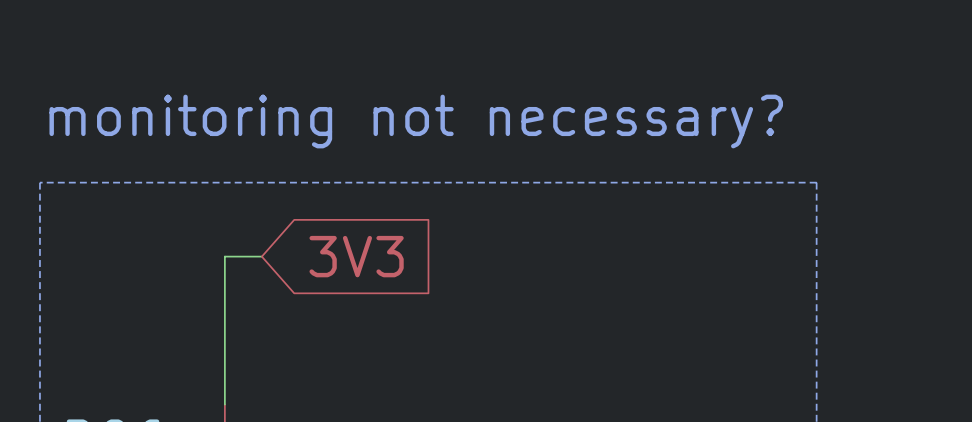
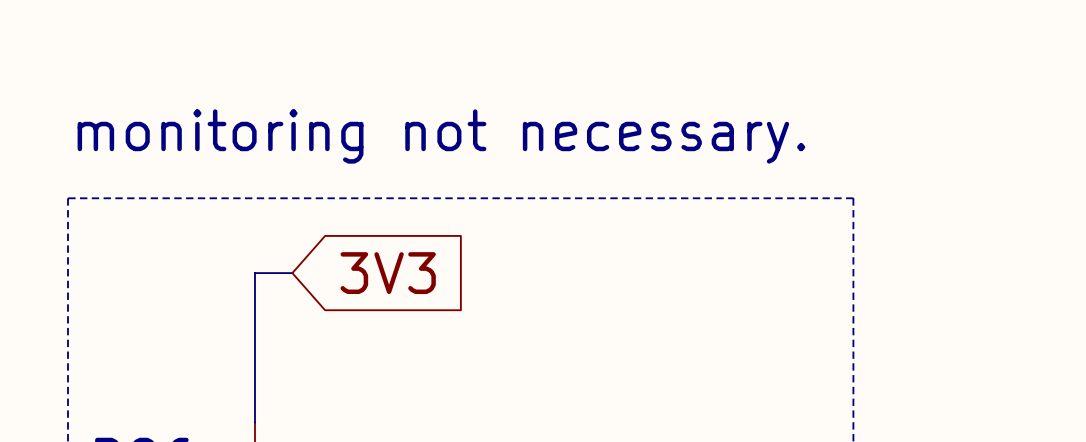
text: monitoring not necessary? (416, 121) -> monitoring not necessary. (441, 136)

